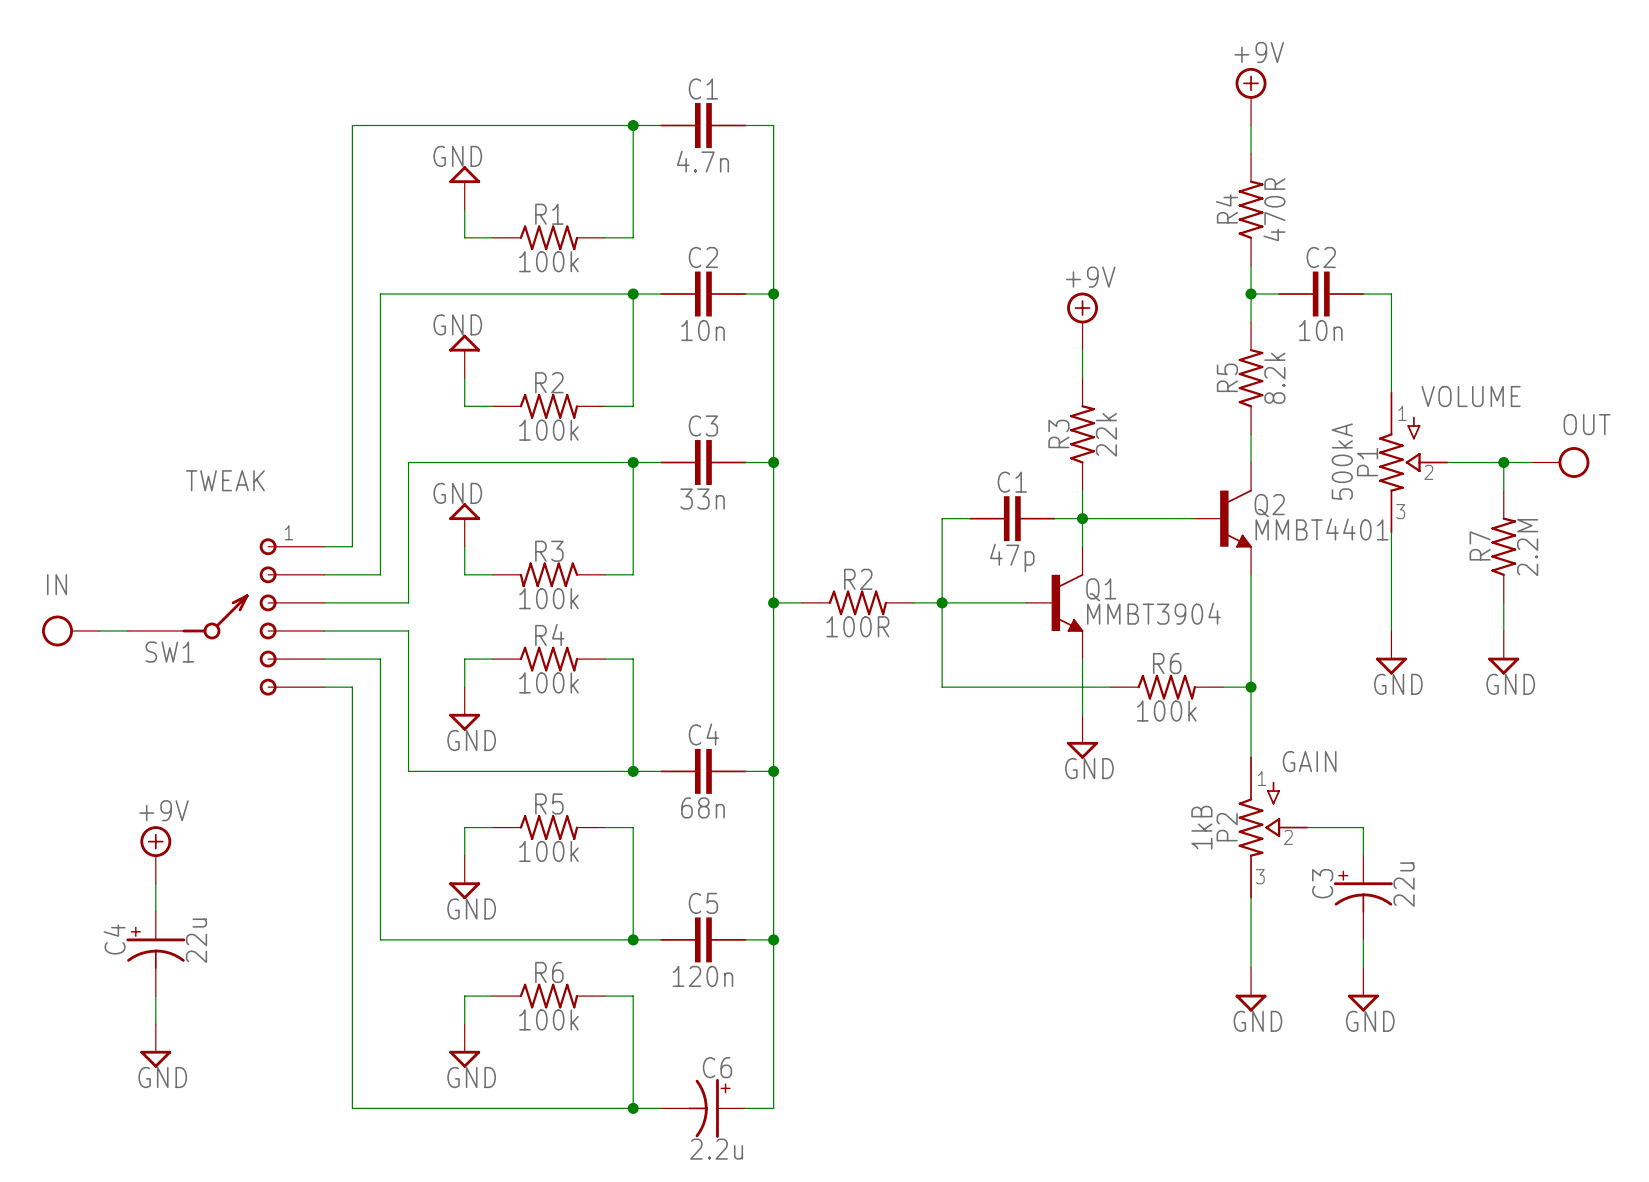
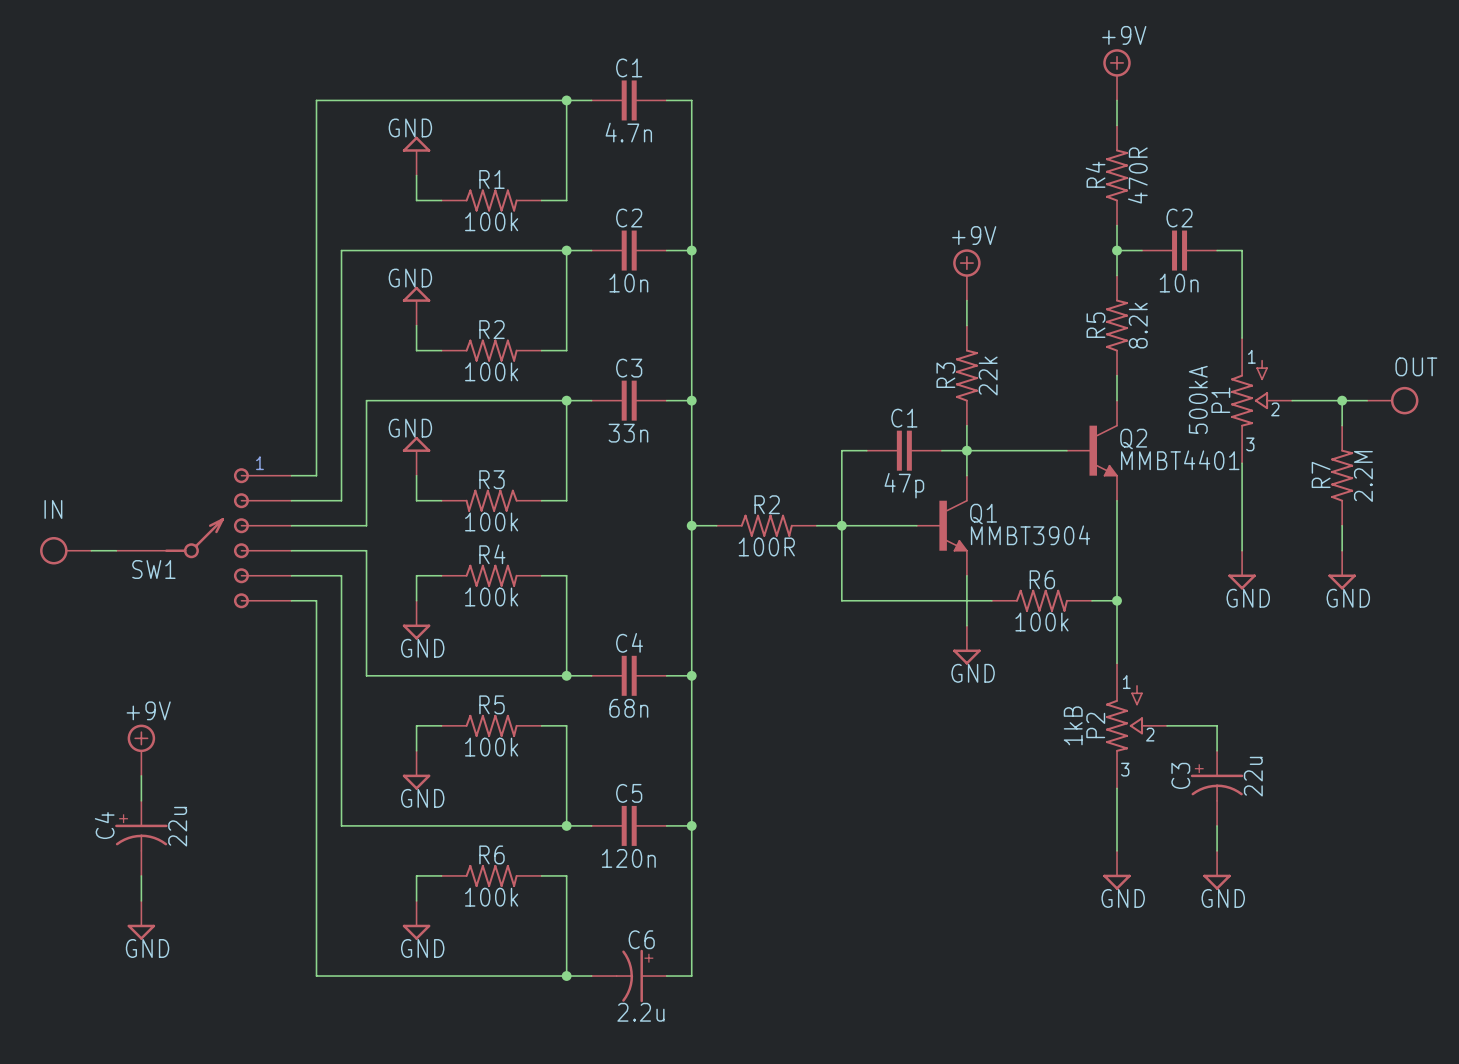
text: VOLUME (1471, 396) -> none
text: TWEAK (225, 480) -> none
text: GAIN (1309, 761) -> none

